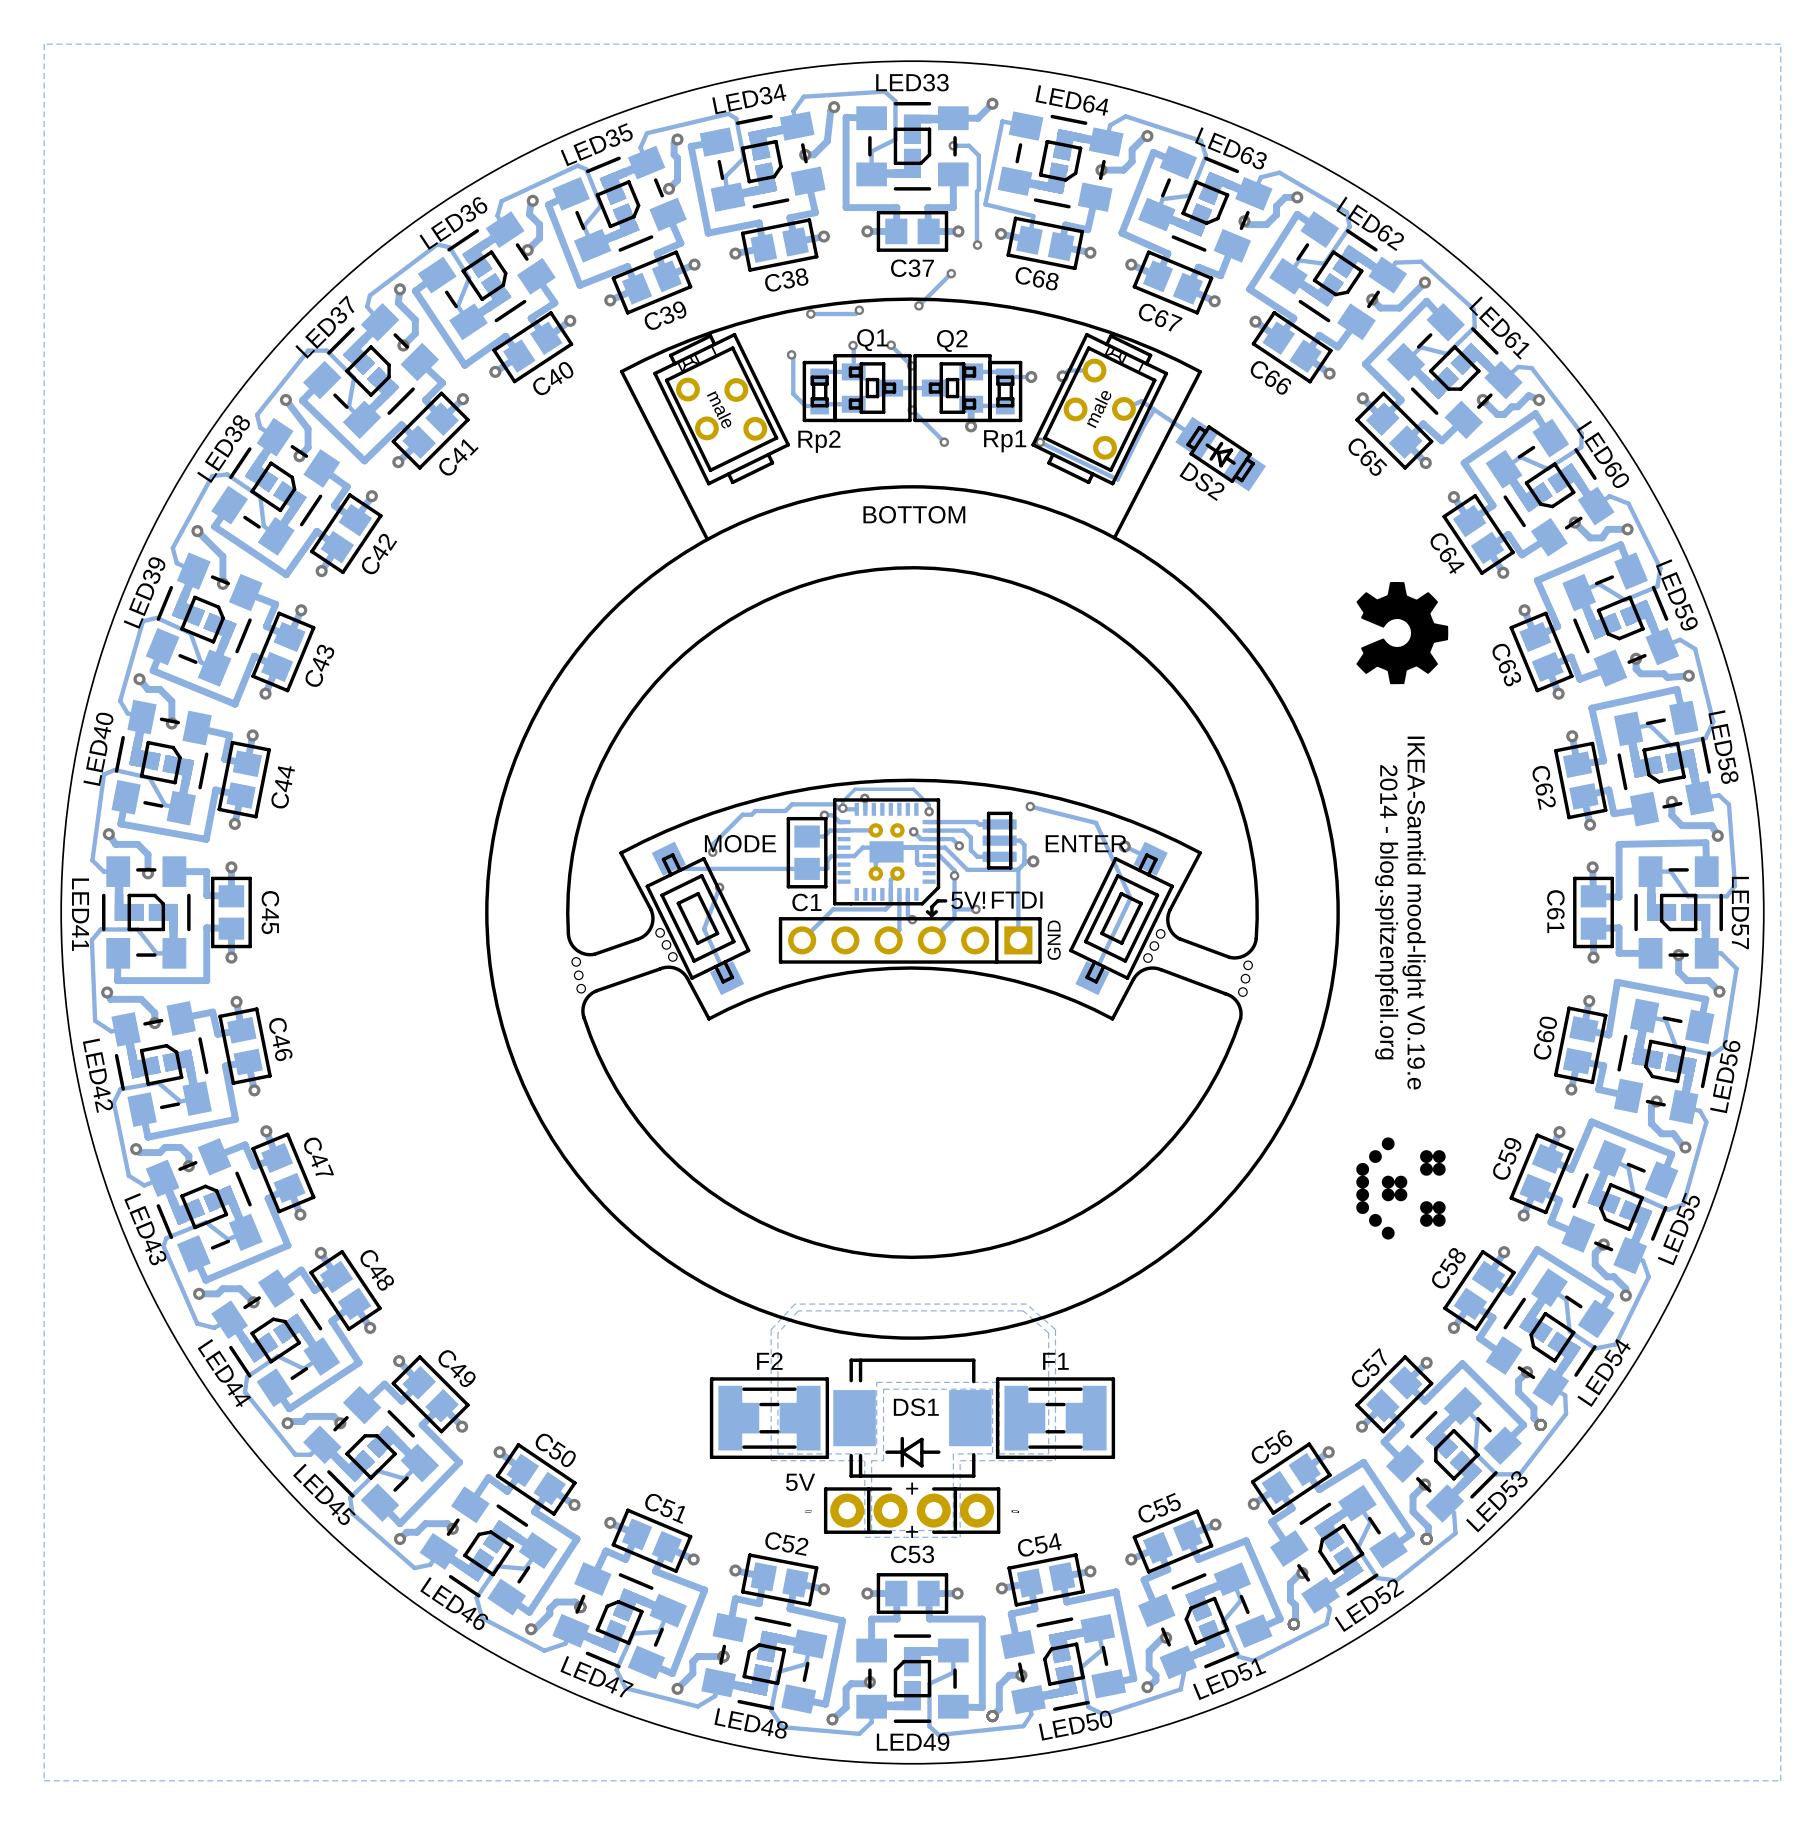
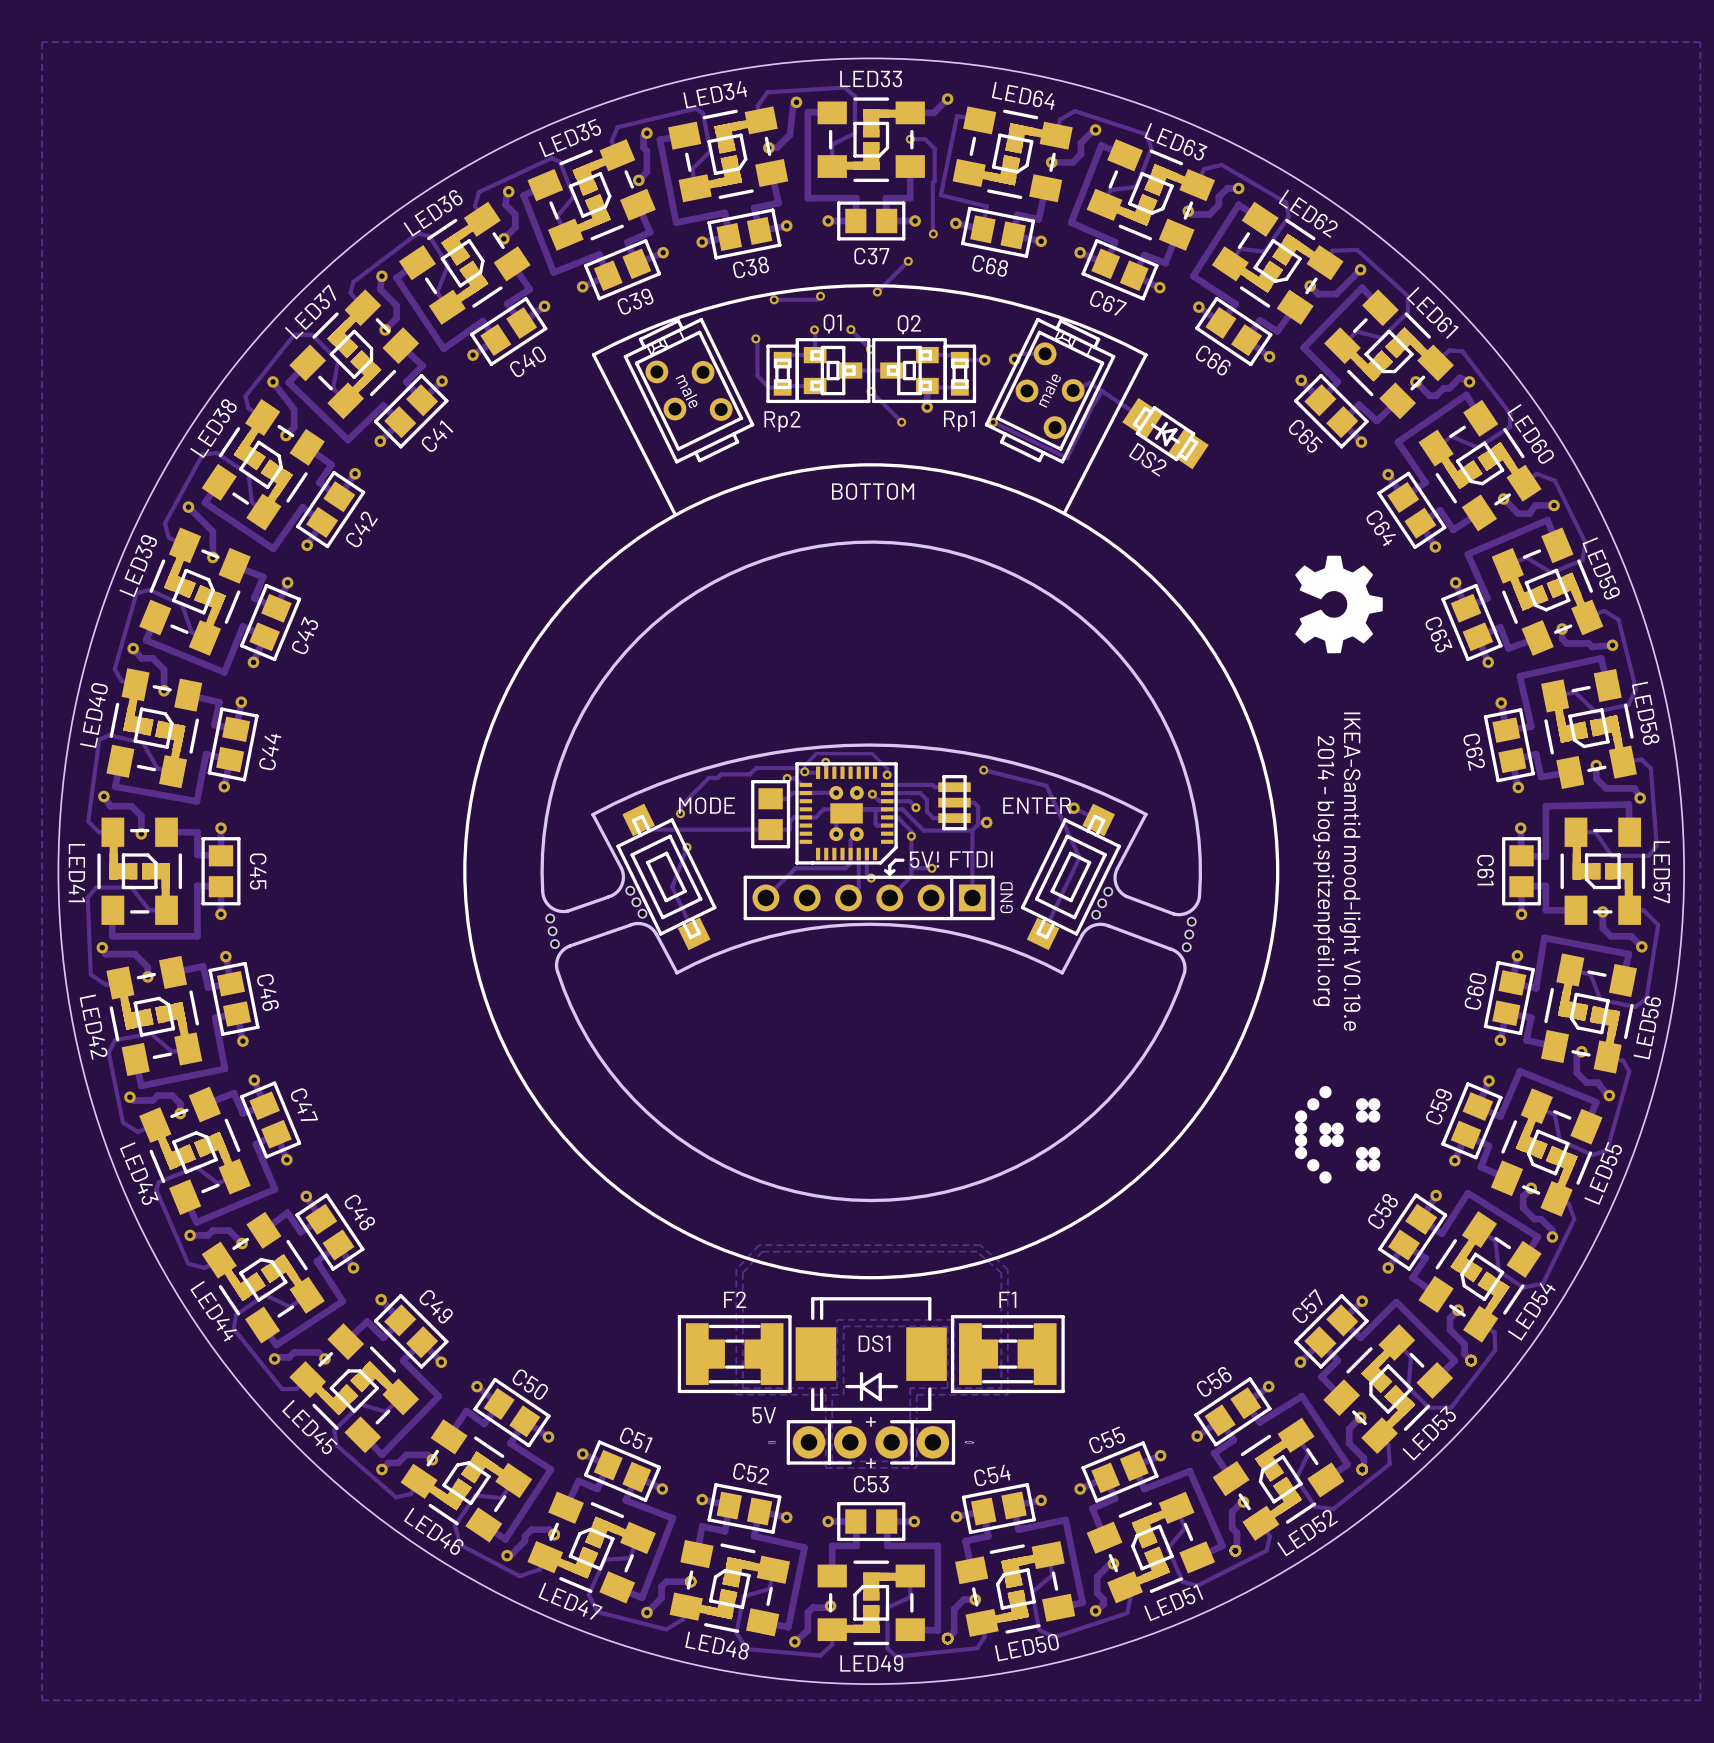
C1 name: C1 (806, 902) -> none

